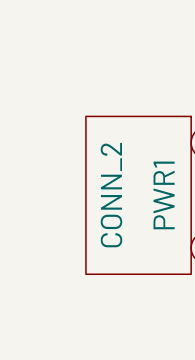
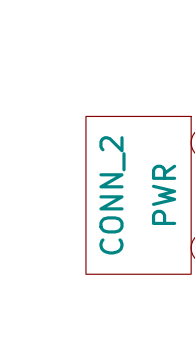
PWR1 name: PWR1 (164, 195) -> PWR (164, 194)

